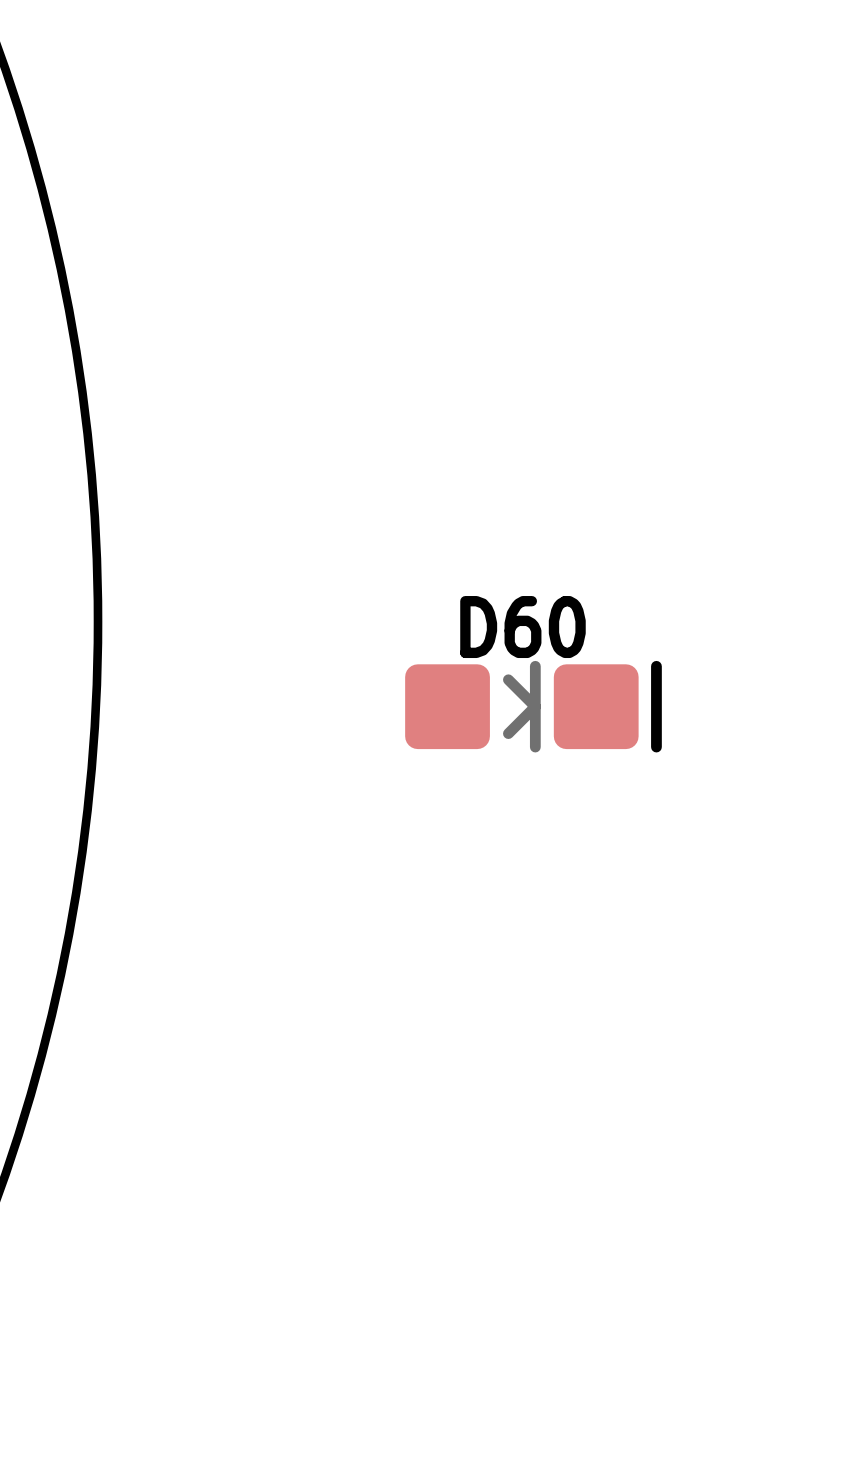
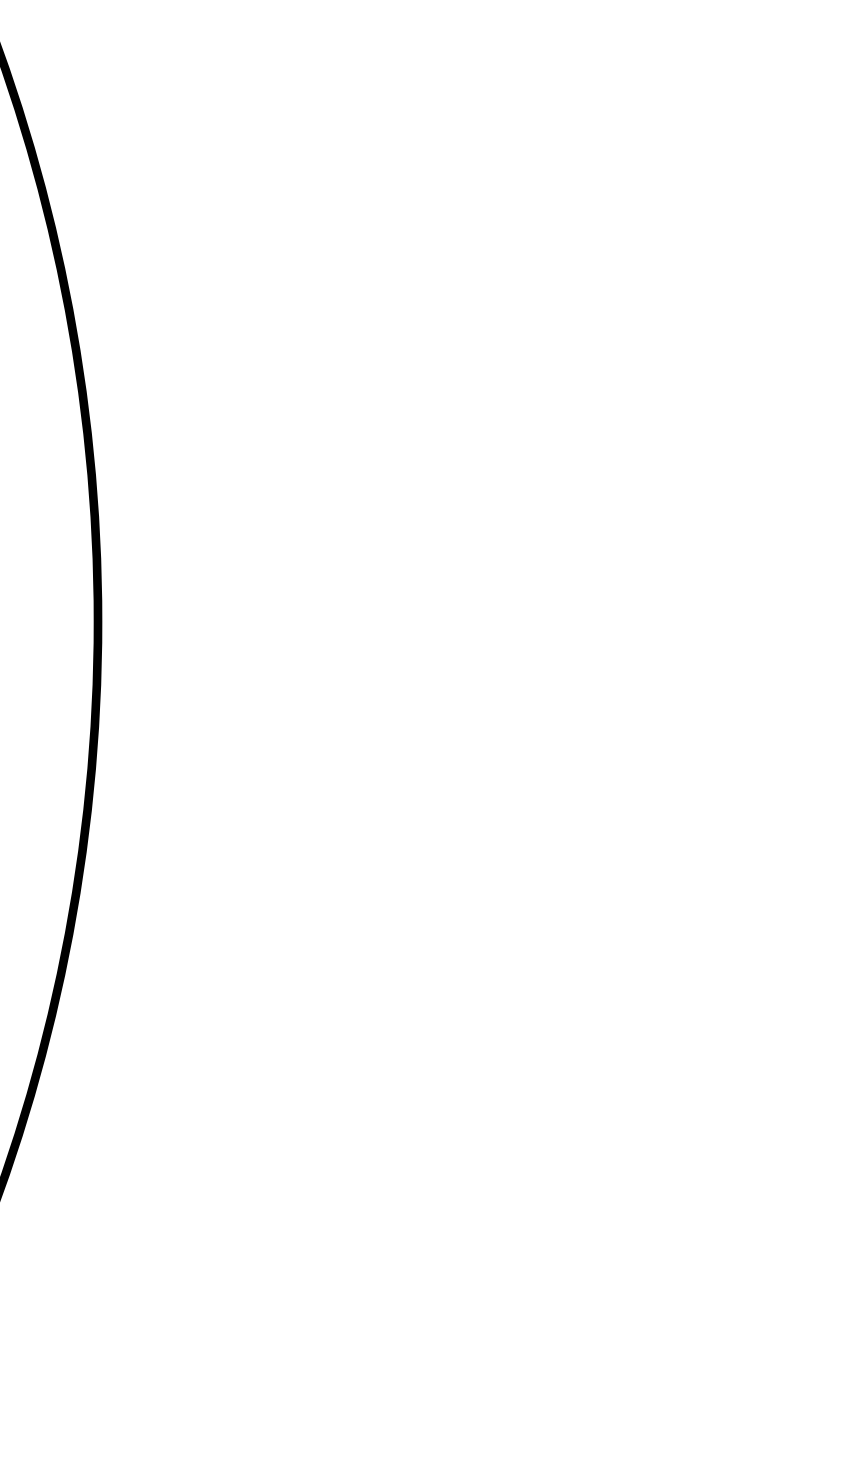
D60: (533, 706) -> none

